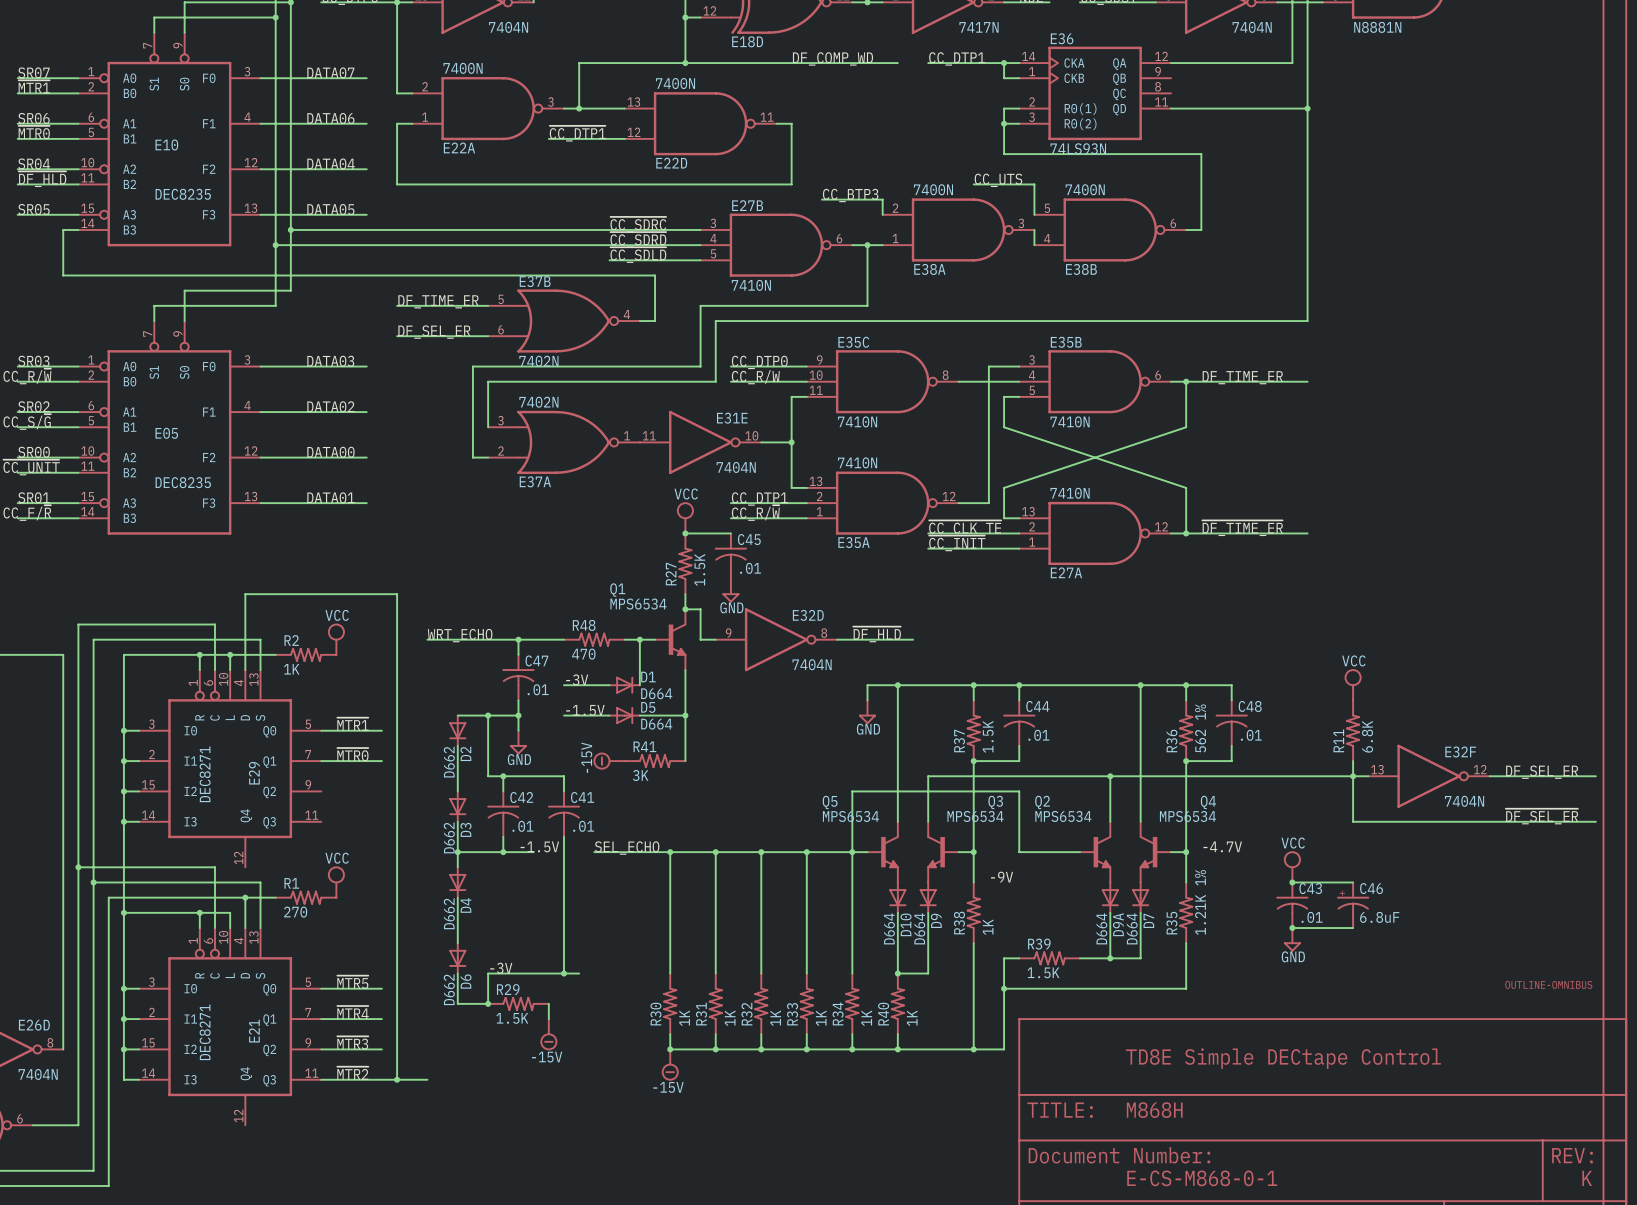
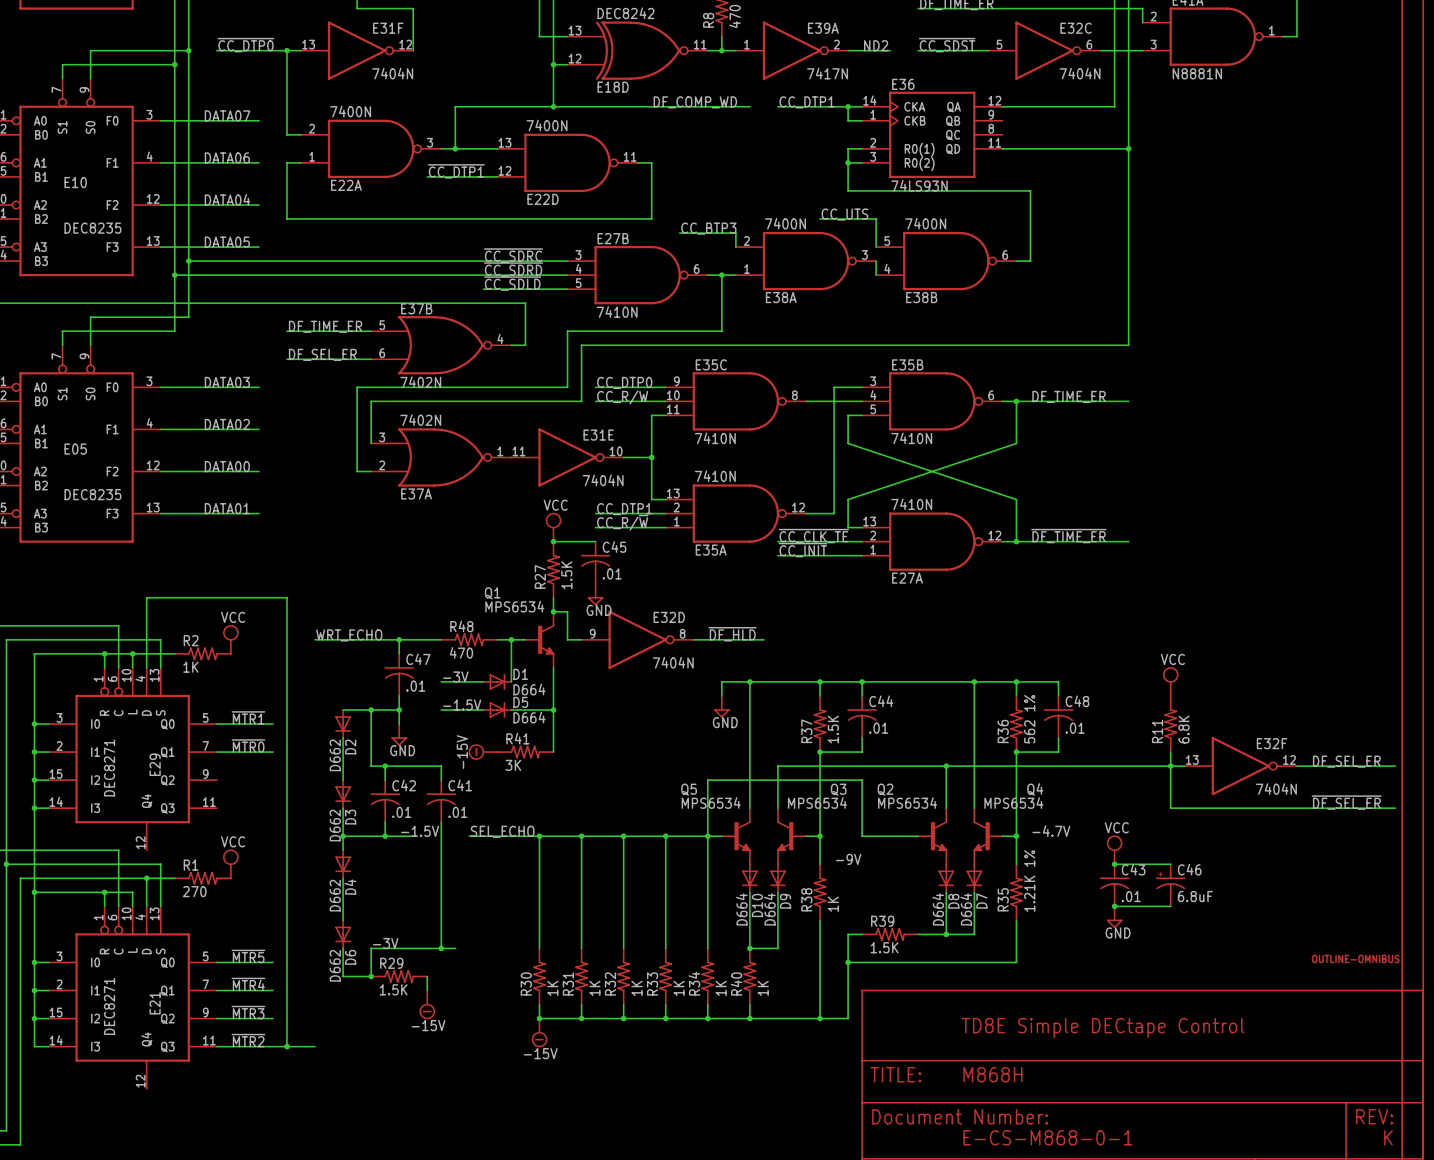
D9A name: D9A (1118, 924) -> D8 (953, 901)

